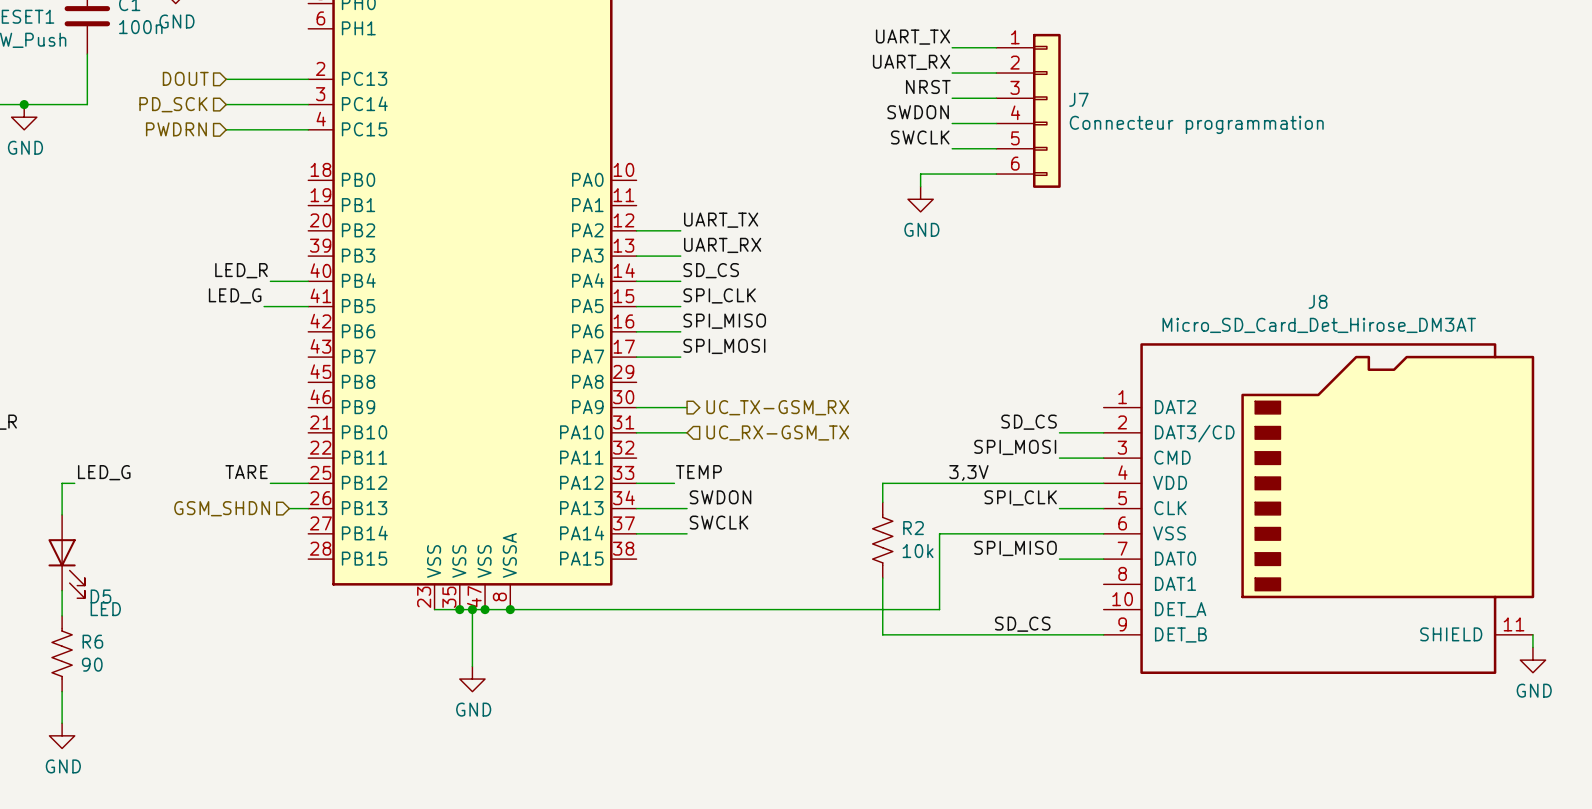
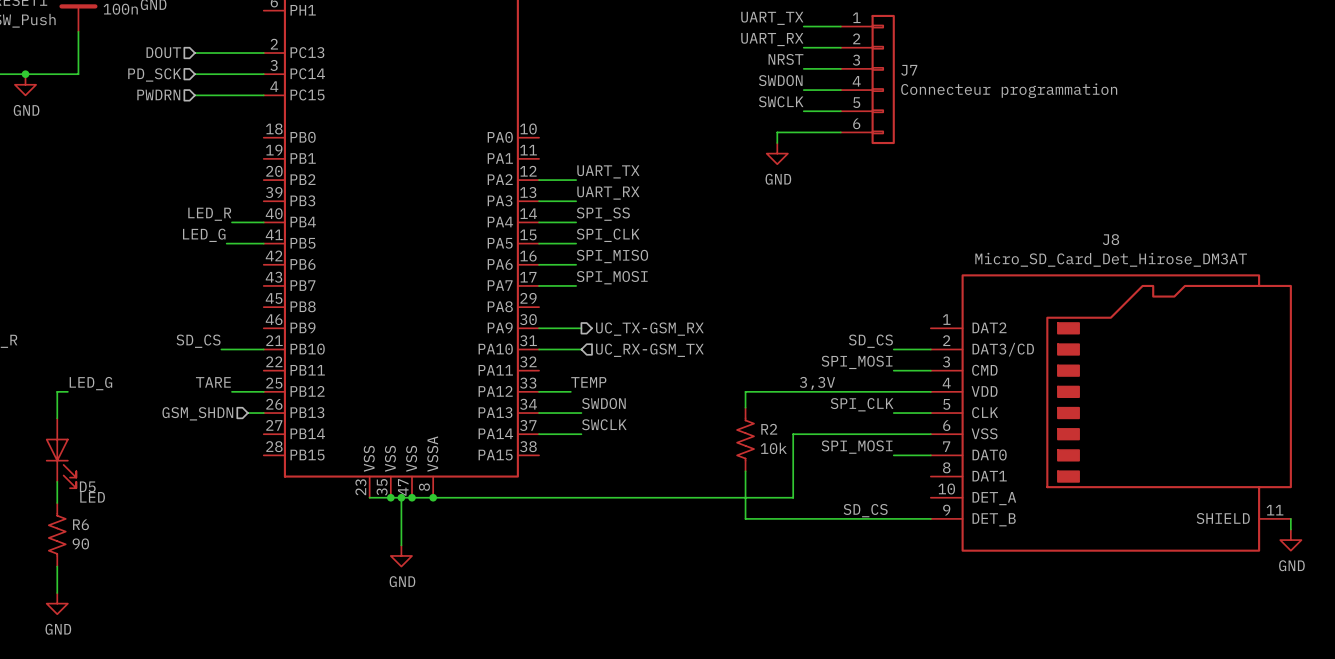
label: SD_CS (711, 270) -> SPI_SS (603, 214)
label: none -> SD_CS (198, 341)
wire: none -> (221, 349) (263, 349)
label: SPI_MISO (1015, 548) -> SPI_MOSI (857, 447)

